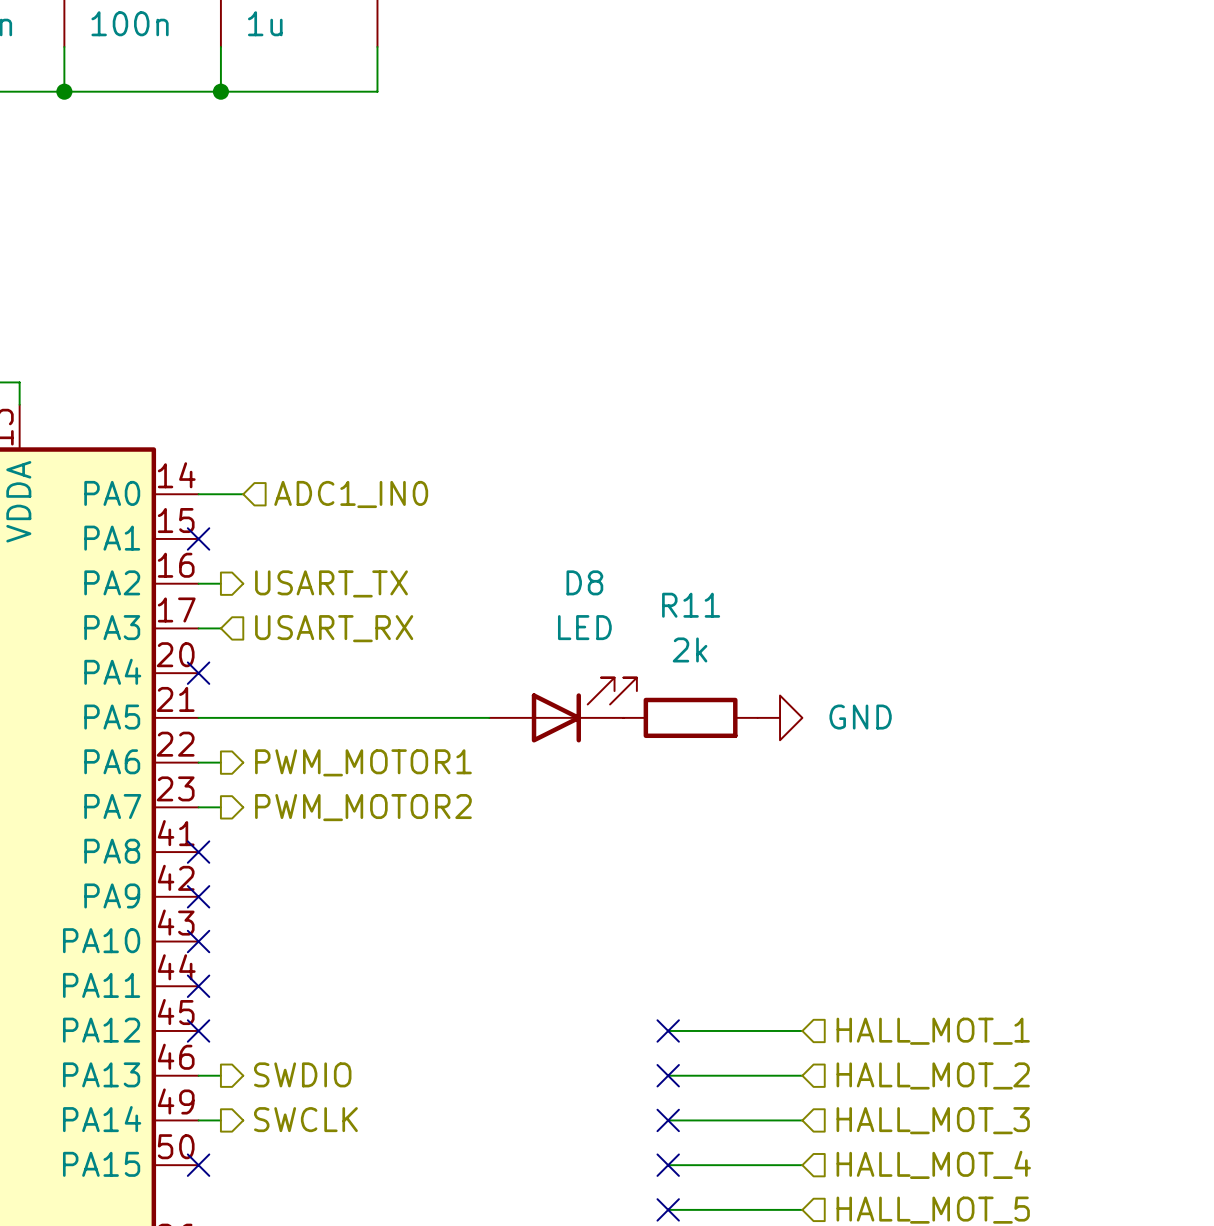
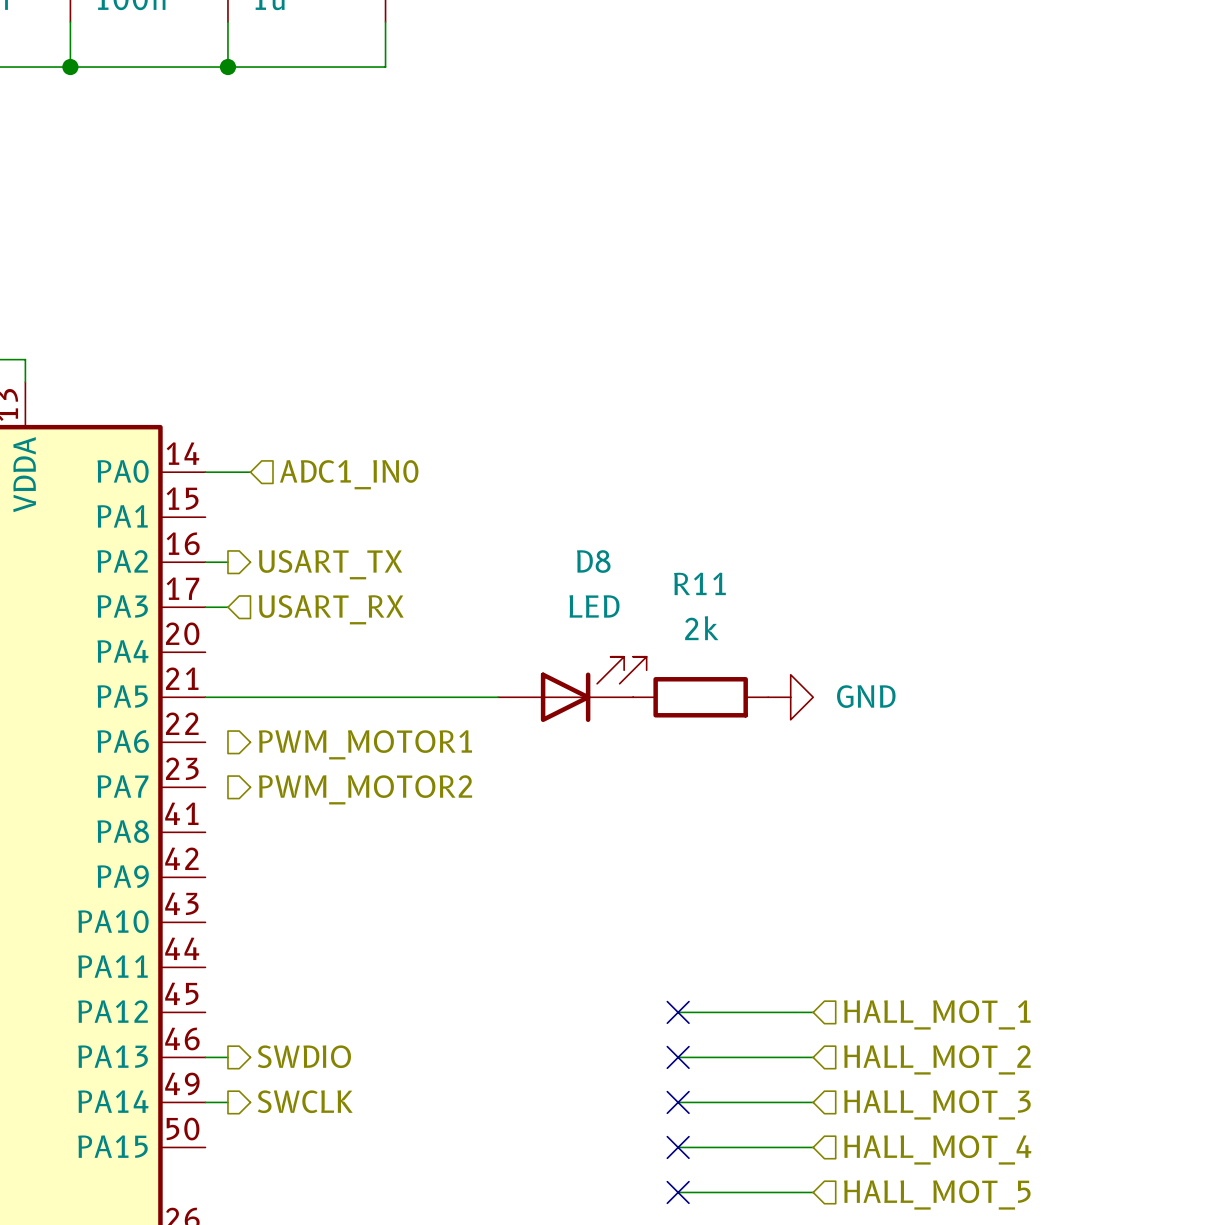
no-connect mark: (198, 538) -> none
no-connect mark: (198, 673) -> none
wire: (198, 762) (220, 762) -> none
wire: (198, 807) (220, 807) -> none
no-connect mark: (198, 852) -> none
no-connect mark: (198, 896) -> none
no-connect mark: (198, 941) -> none
no-connect mark: (198, 986) -> none
no-connect mark: (198, 1030) -> none
no-connect mark: (198, 1165) -> none

